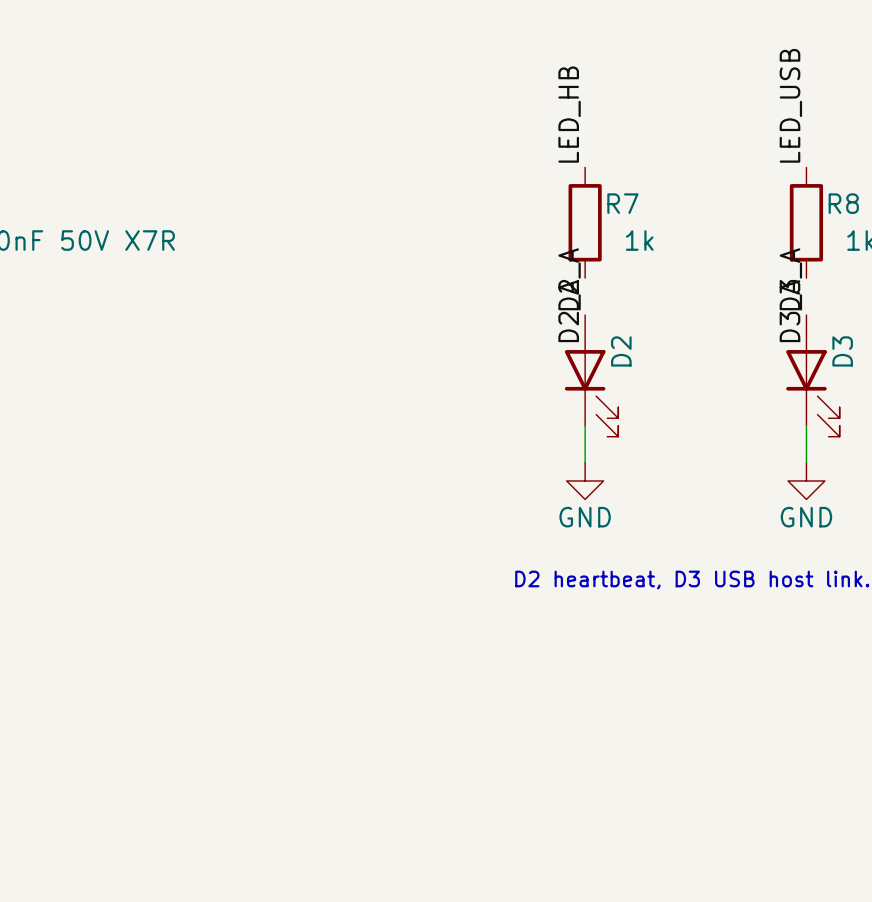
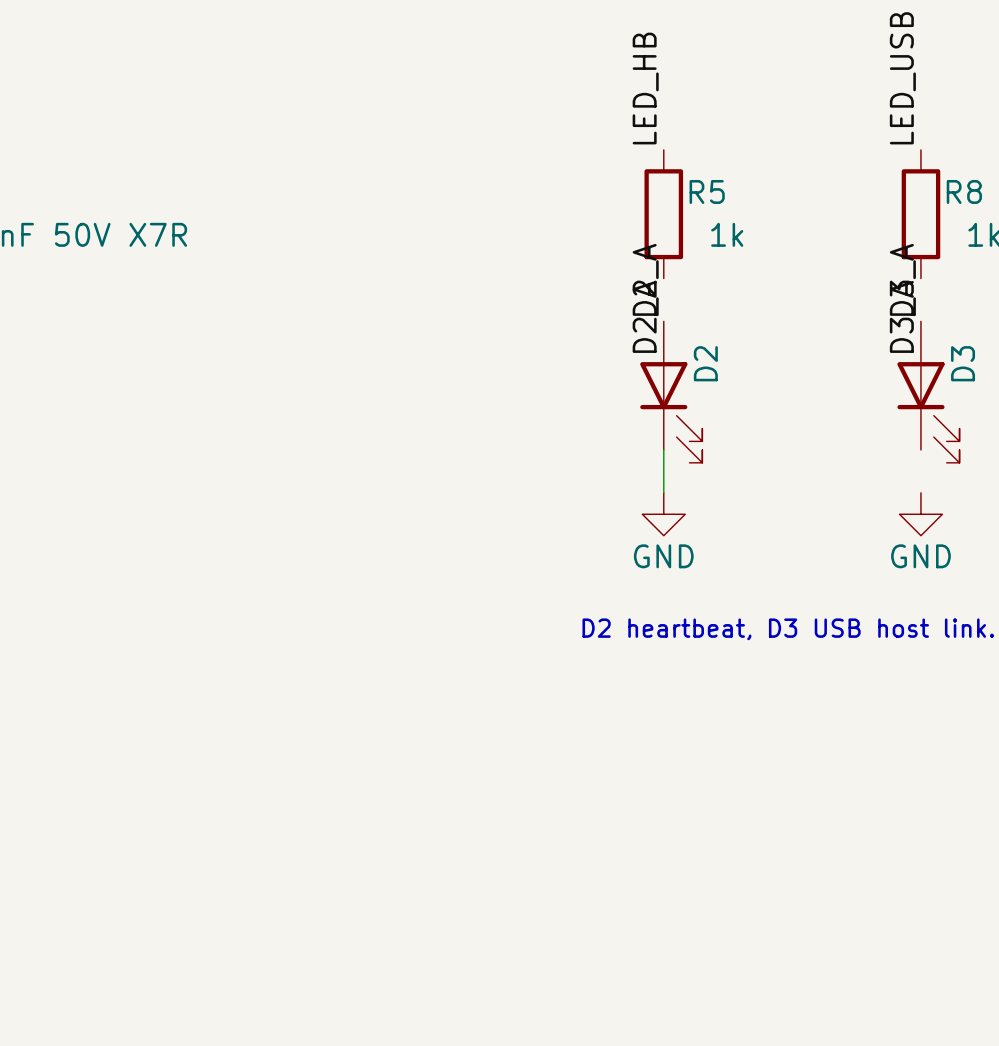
R7 name: R7 (622, 203) -> R5 (707, 191)
wire: (806, 425) (806, 462) -> none

